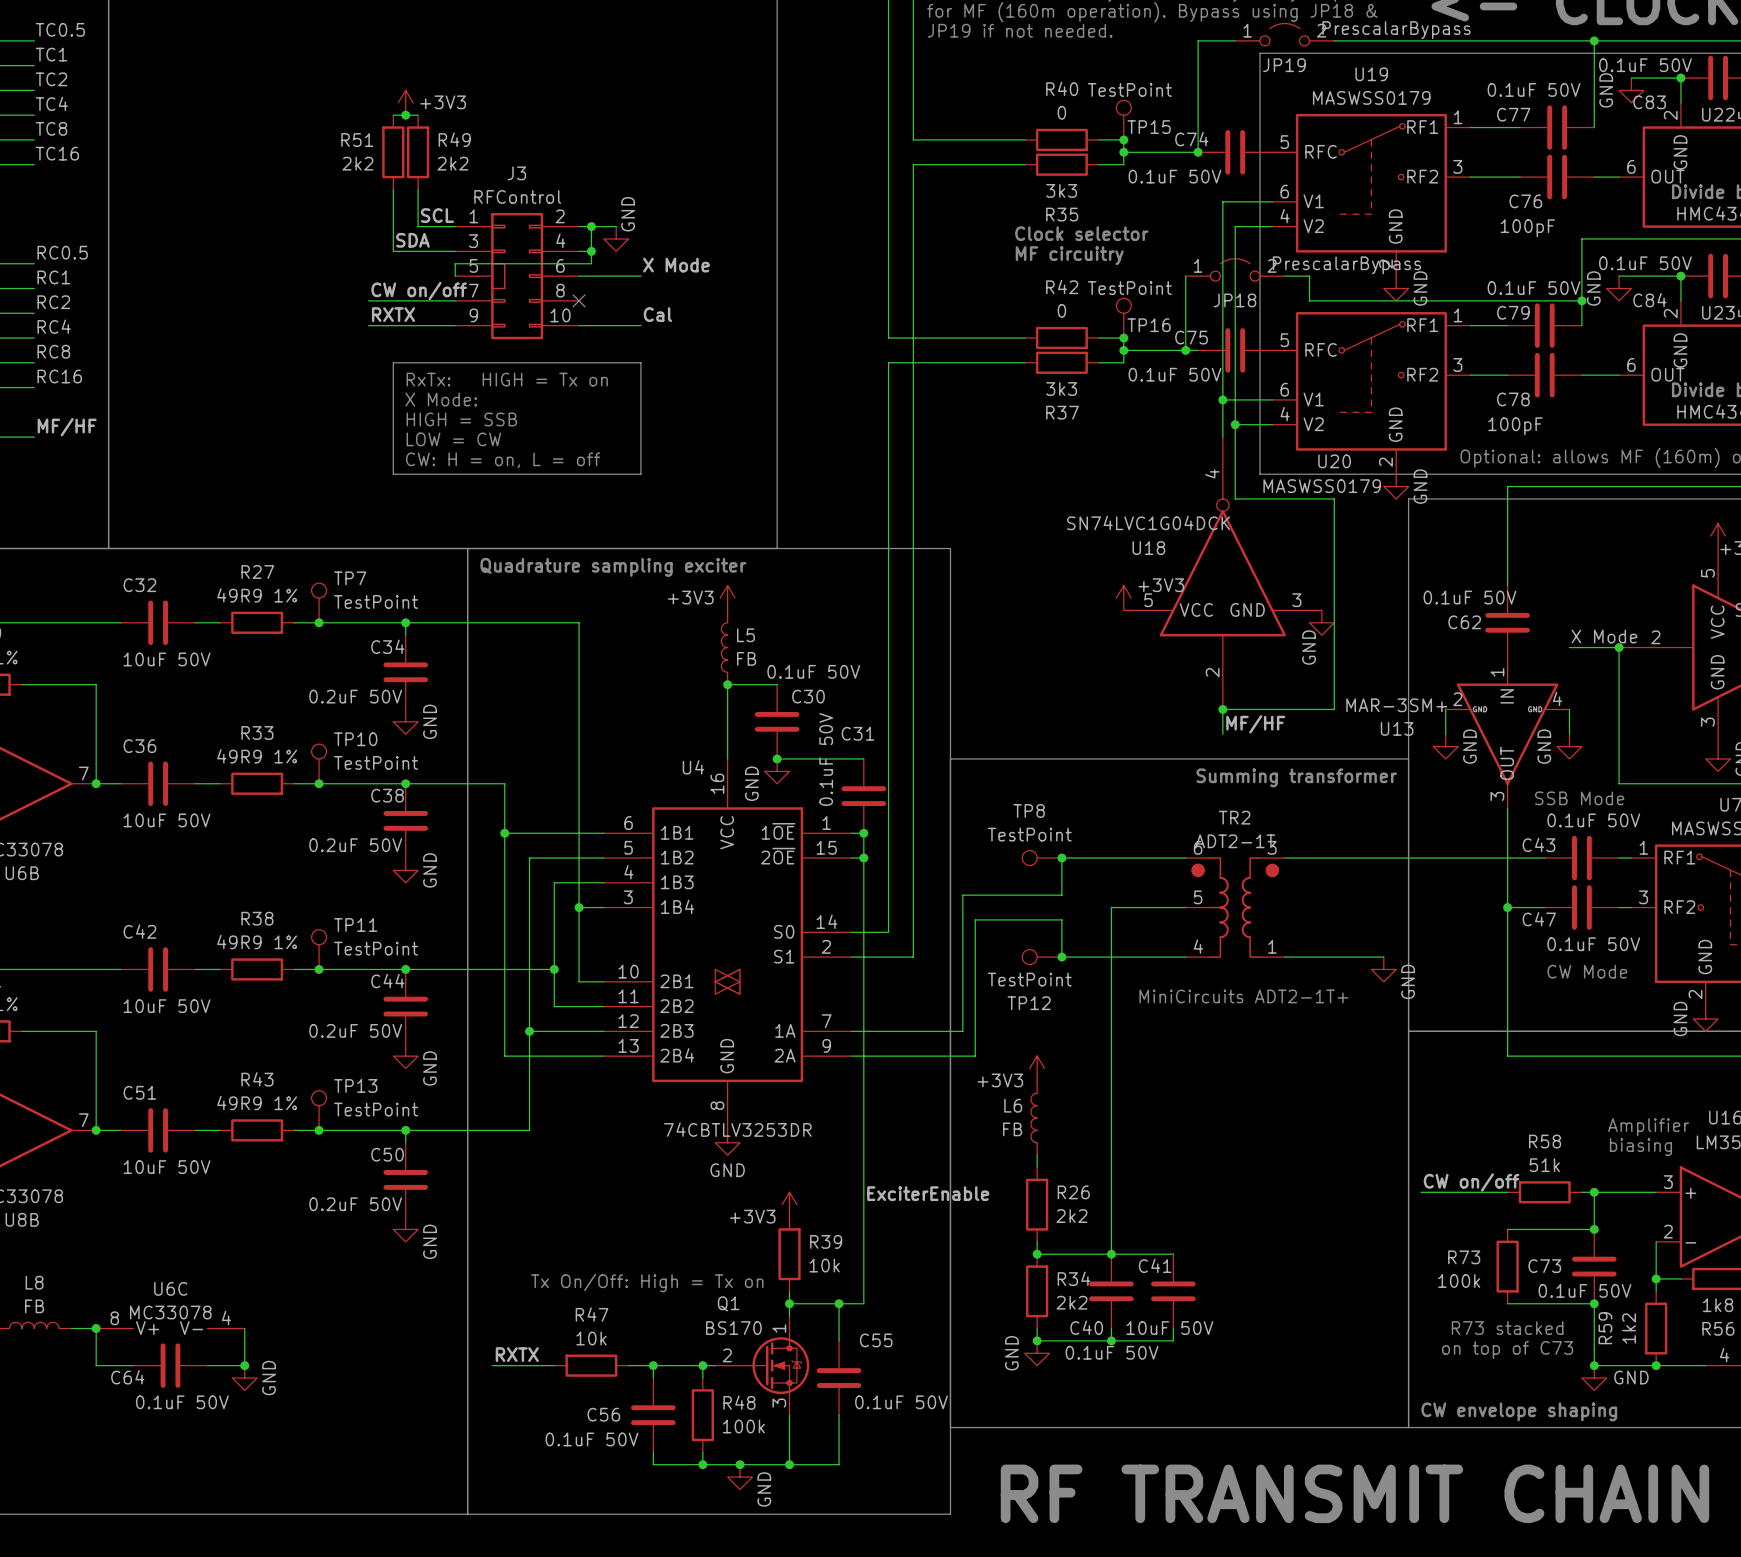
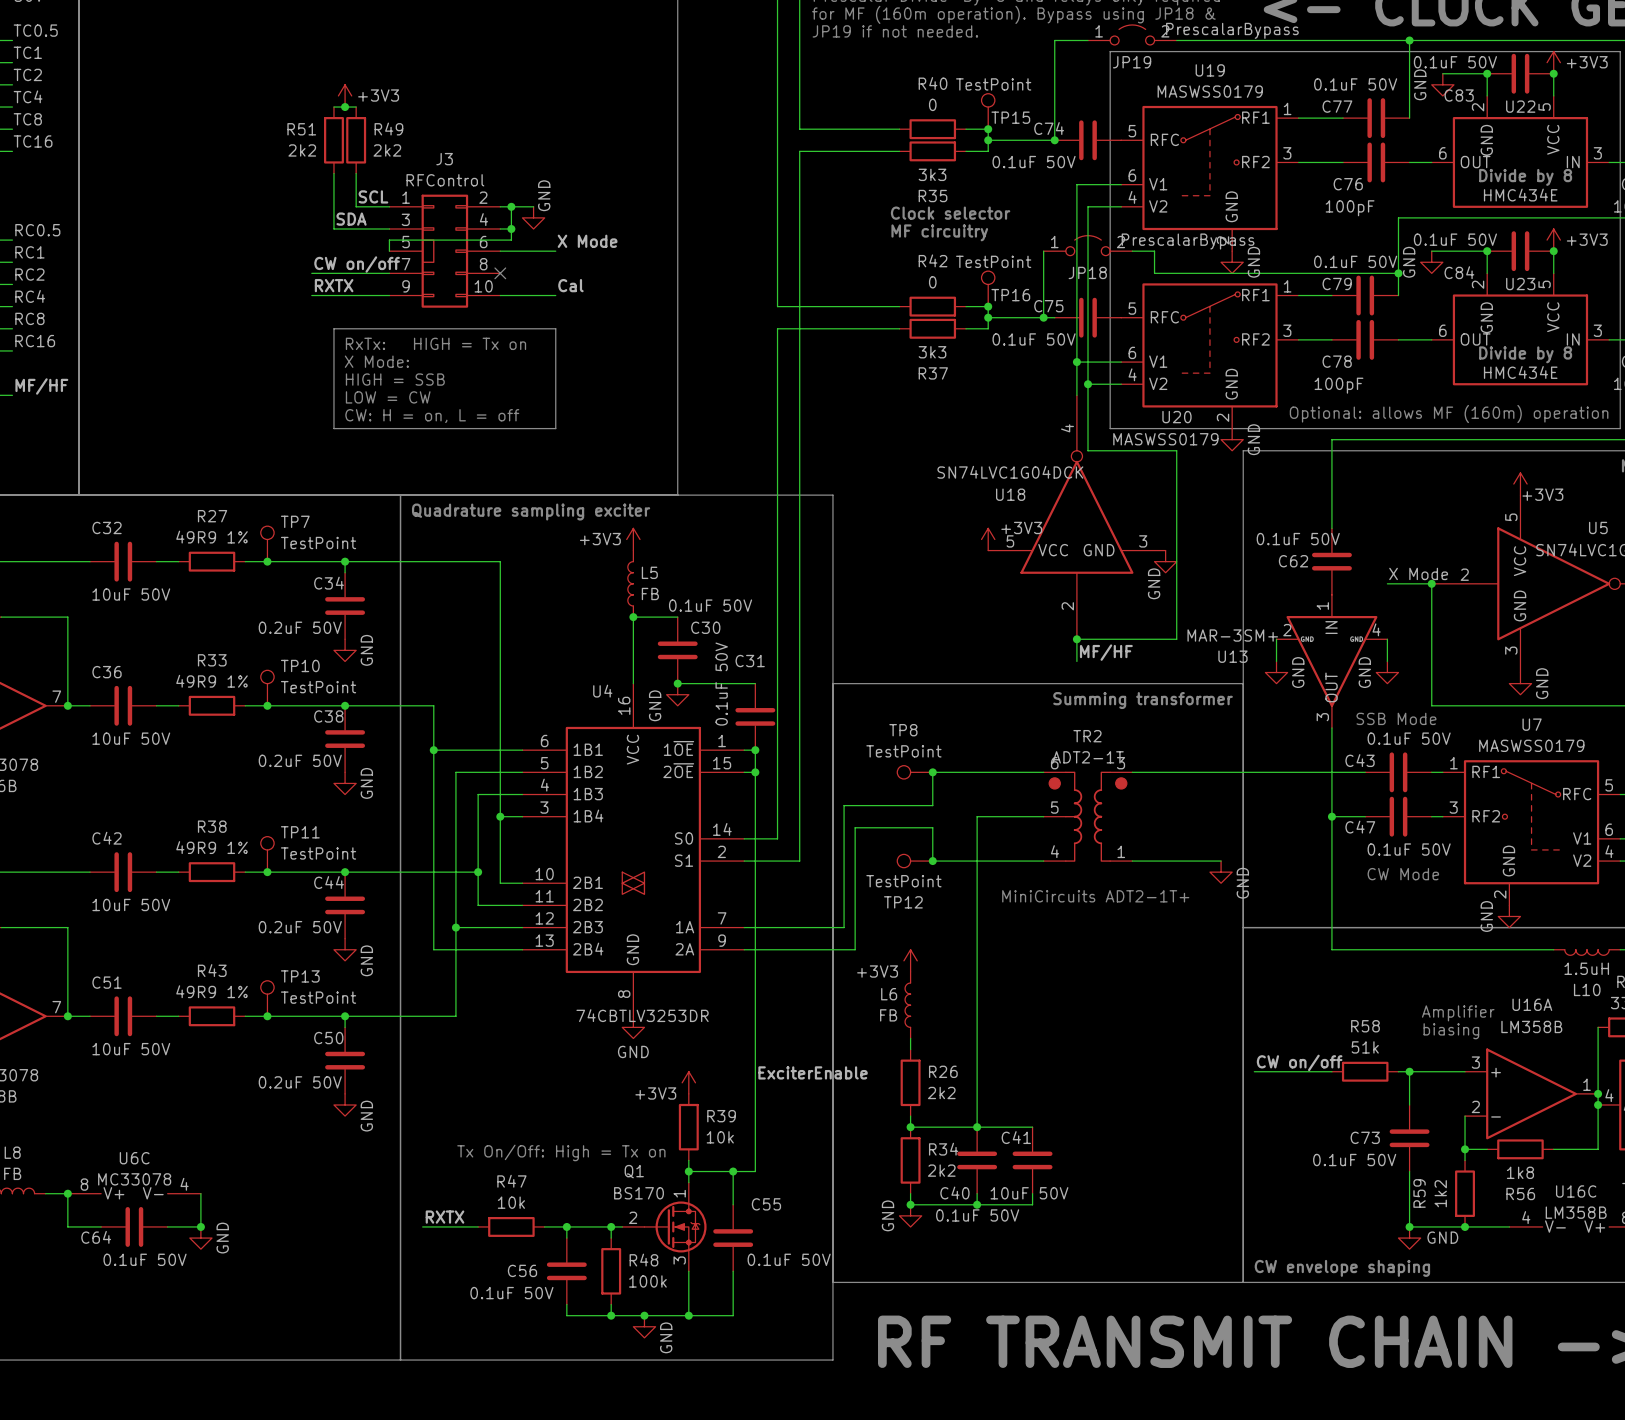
wire: (1507, 1229) (1594, 1229) -> none
junction: (1594, 1229) -> none
R73: 100k (1507, 1266) -> none
C73 value position: 0.1uF 50V (1584, 1290) -> 0.1uF 50V (1354, 1160)
wire: (1507, 1303) (1594, 1303) -> none
junction: (1594, 1303) -> none
text: R73 stacked (1507, 1328) -> none
text: on top of C73 (1507, 1350) -> none

